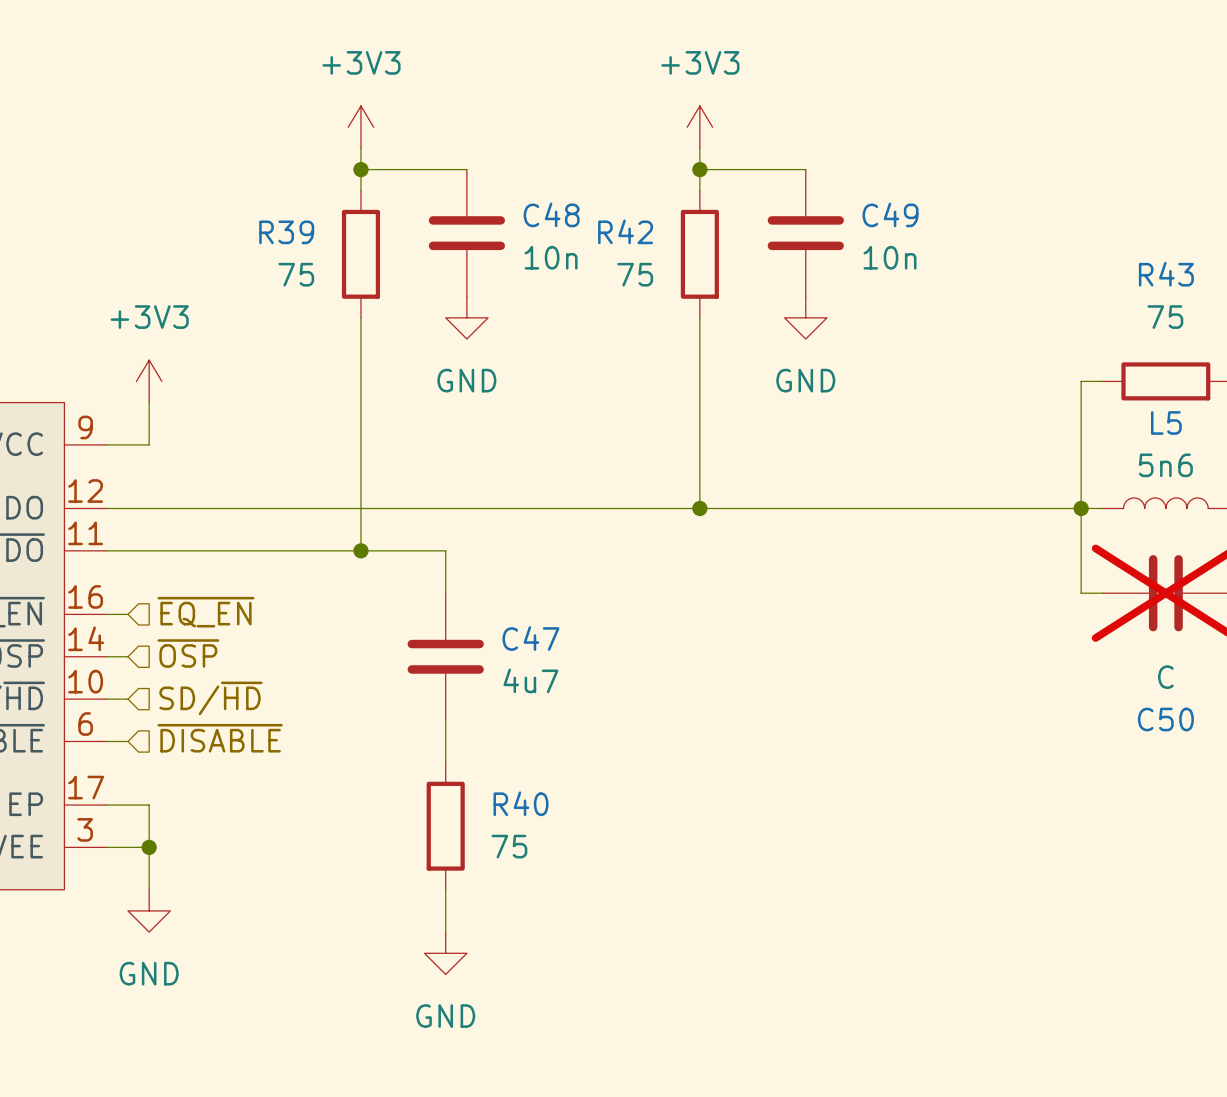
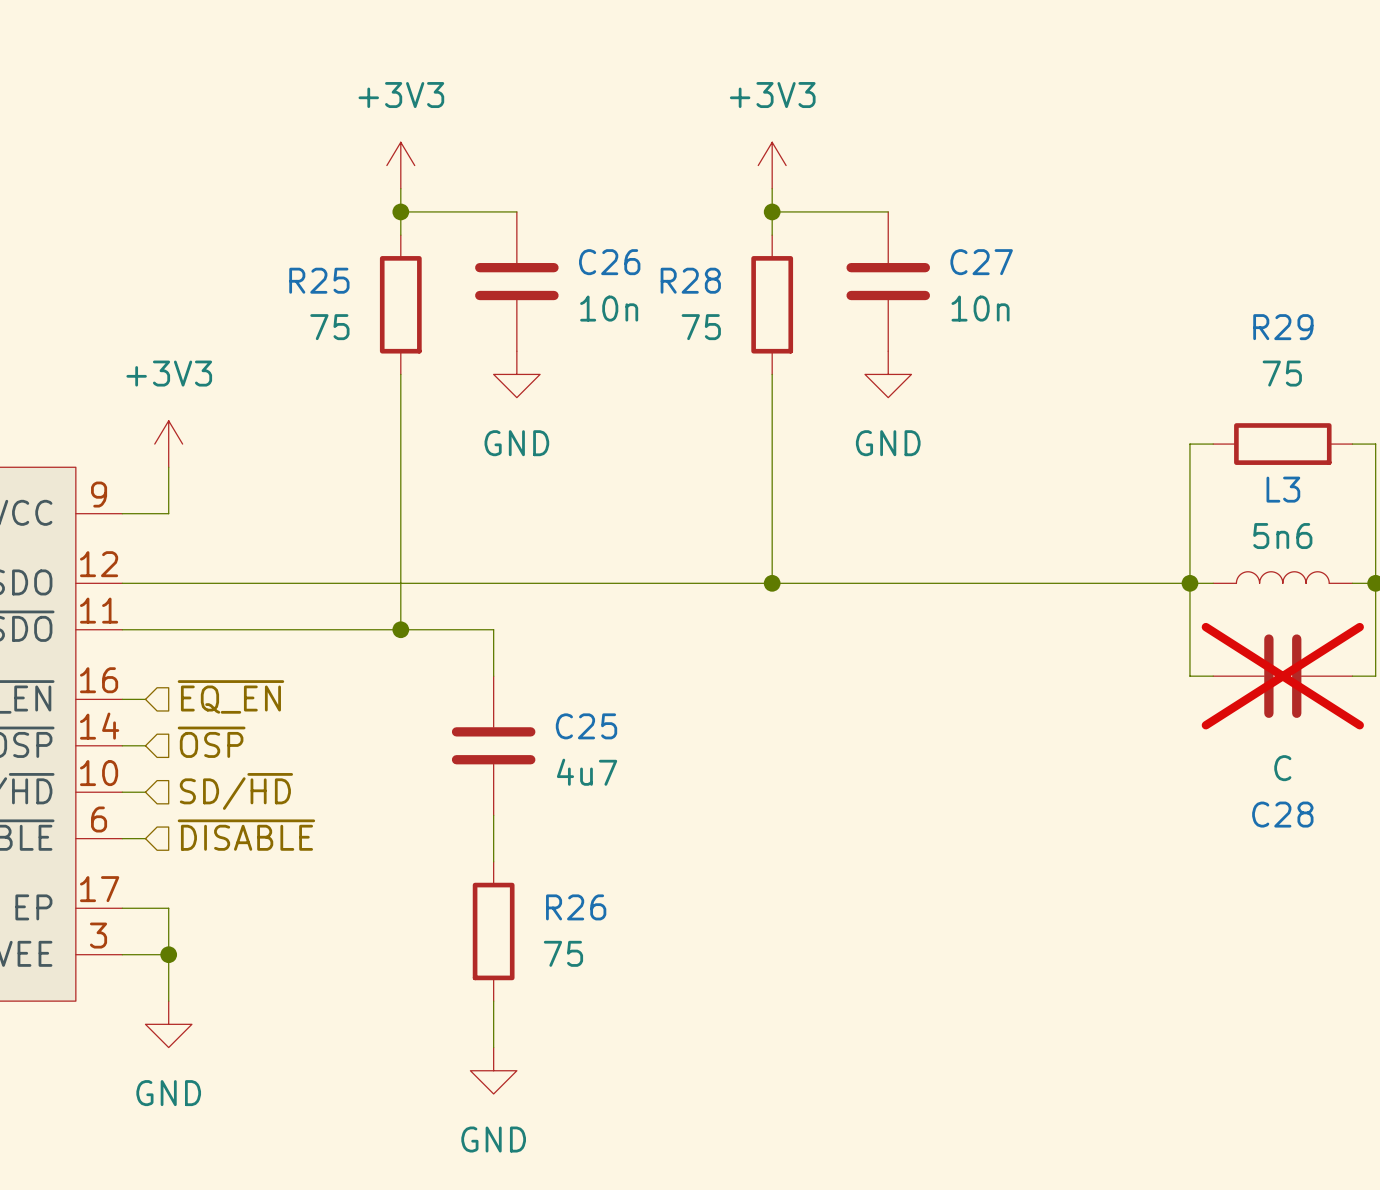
C48 name: C48 (551, 214) -> C26 (609, 262)
C49 name: C49 (890, 214) -> C27 (981, 262)
R42 name: R42 (625, 231) -> R28 (690, 280)
R39 name: R39 (286, 232) -> R25 (319, 280)
R43 name: R43 (1166, 274) -> R29 (1283, 327)
L5 name: L5 (1166, 422) -> L3 (1283, 489)
C47 name: C47 (530, 638) -> C25 (586, 726)
C50 name: C50 (1165, 719) -> C28 (1282, 814)
R40 name: R40 (521, 803) -> R26 (576, 907)

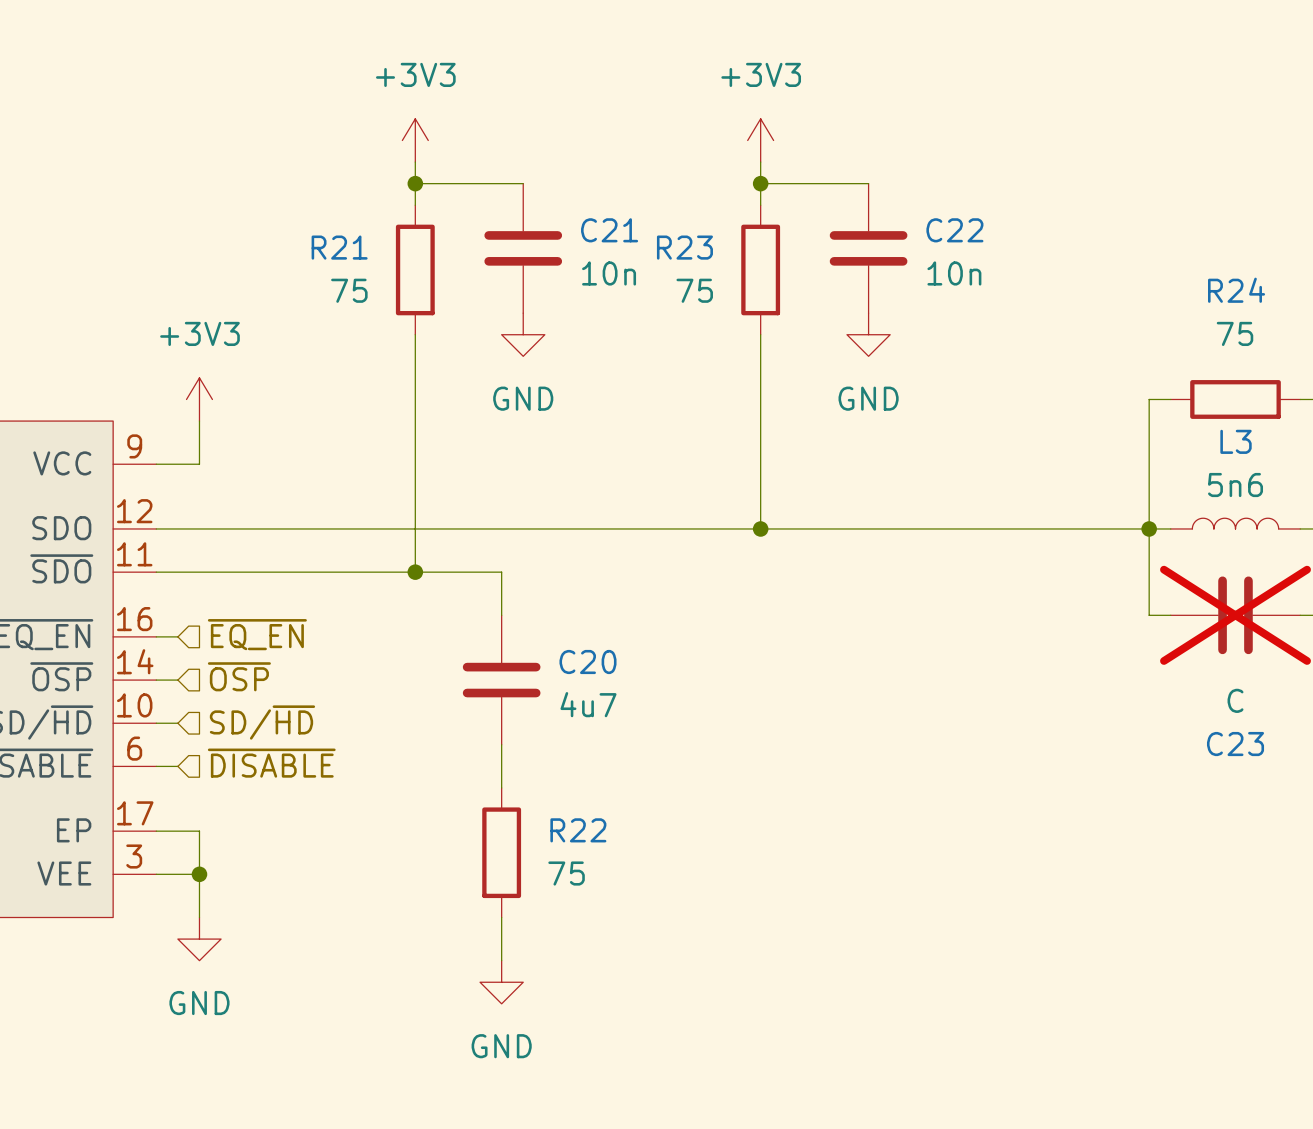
C26 name: C26 (609, 262) -> C21 (609, 230)
C27 name: C27 (981, 262) -> C22 (954, 230)
R25 name: R25 (319, 280) -> R21 (339, 247)
R28 name: R28 (690, 280) -> R23 (684, 247)
R29 name: R29 (1283, 327) -> R24 (1236, 290)
C25 name: C25 (586, 726) -> C20 (587, 661)
C28 name: C28 (1282, 814) -> C23 (1235, 744)
R26 name: R26 (576, 907) -> R22 (578, 830)

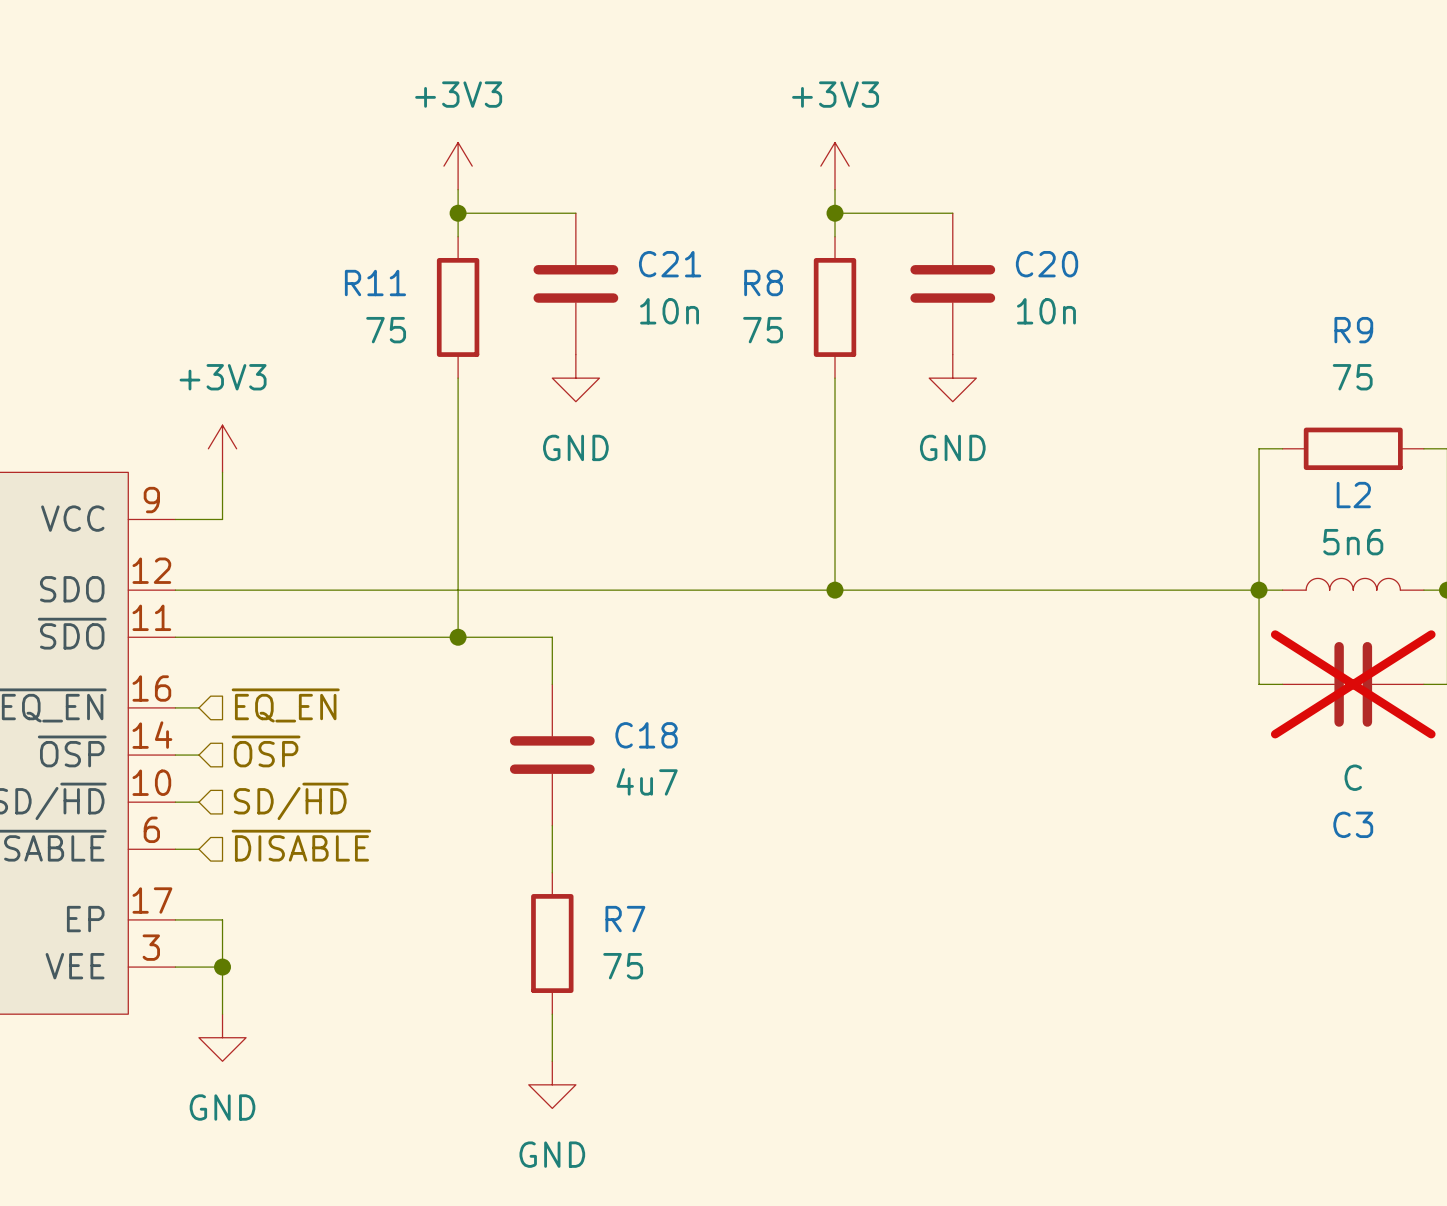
C22 name: C22 (954, 230) -> C20 (1047, 264)
R21 name: R21 (339, 247) -> R11 (375, 283)
R23 name: R23 (684, 247) -> R8 (763, 283)
R24 name: R24 (1236, 290) -> R9 (1353, 330)
L3 name: L3 (1236, 441) -> L2 (1353, 495)
C20 name: C20 (587, 661) -> C18 (646, 735)
C23 name: C23 (1235, 744) -> C3 (1353, 824)
R22 name: R22 (578, 830) -> R7 (625, 919)

